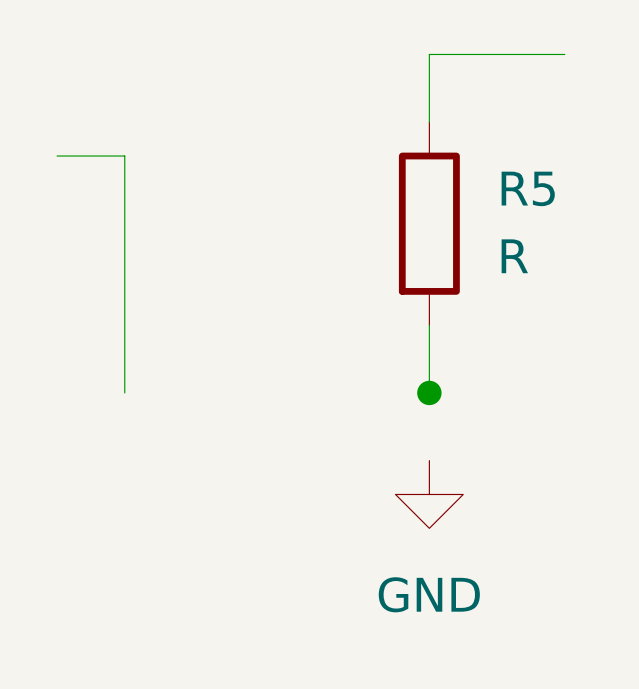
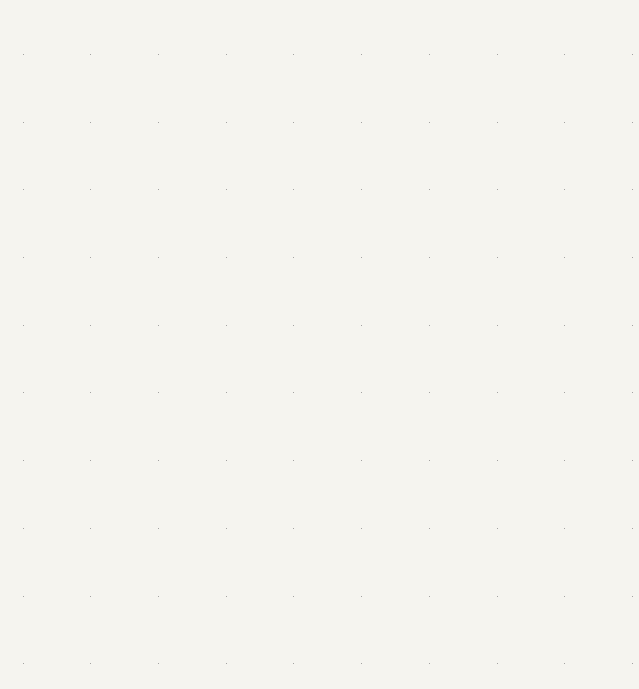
wire: (564, 54) (429, 54) (429, 122) -> none
wire: (57, 156) (124, 156) (124, 392) -> none
R5: R (429, 223) -> none
wire: (429, 325) (429, 392) -> none
junction: (429, 392) -> none
power symbol: GND (429, 494) -> none

